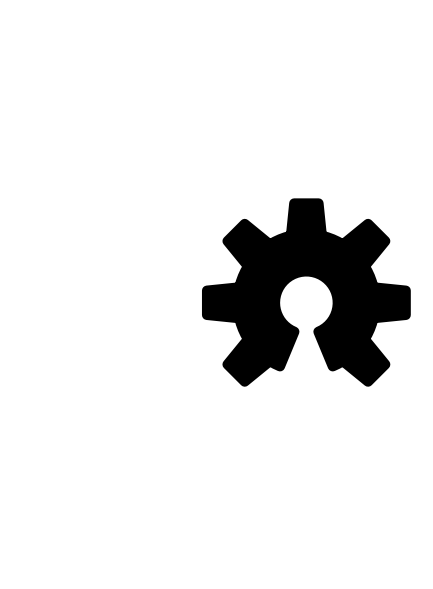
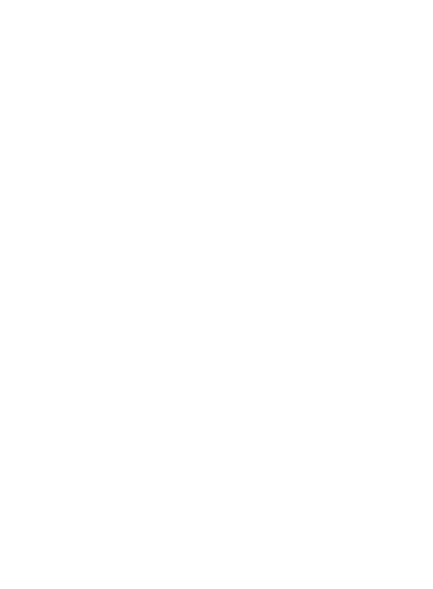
drawing: [201, 198, 411, 387] -> none

